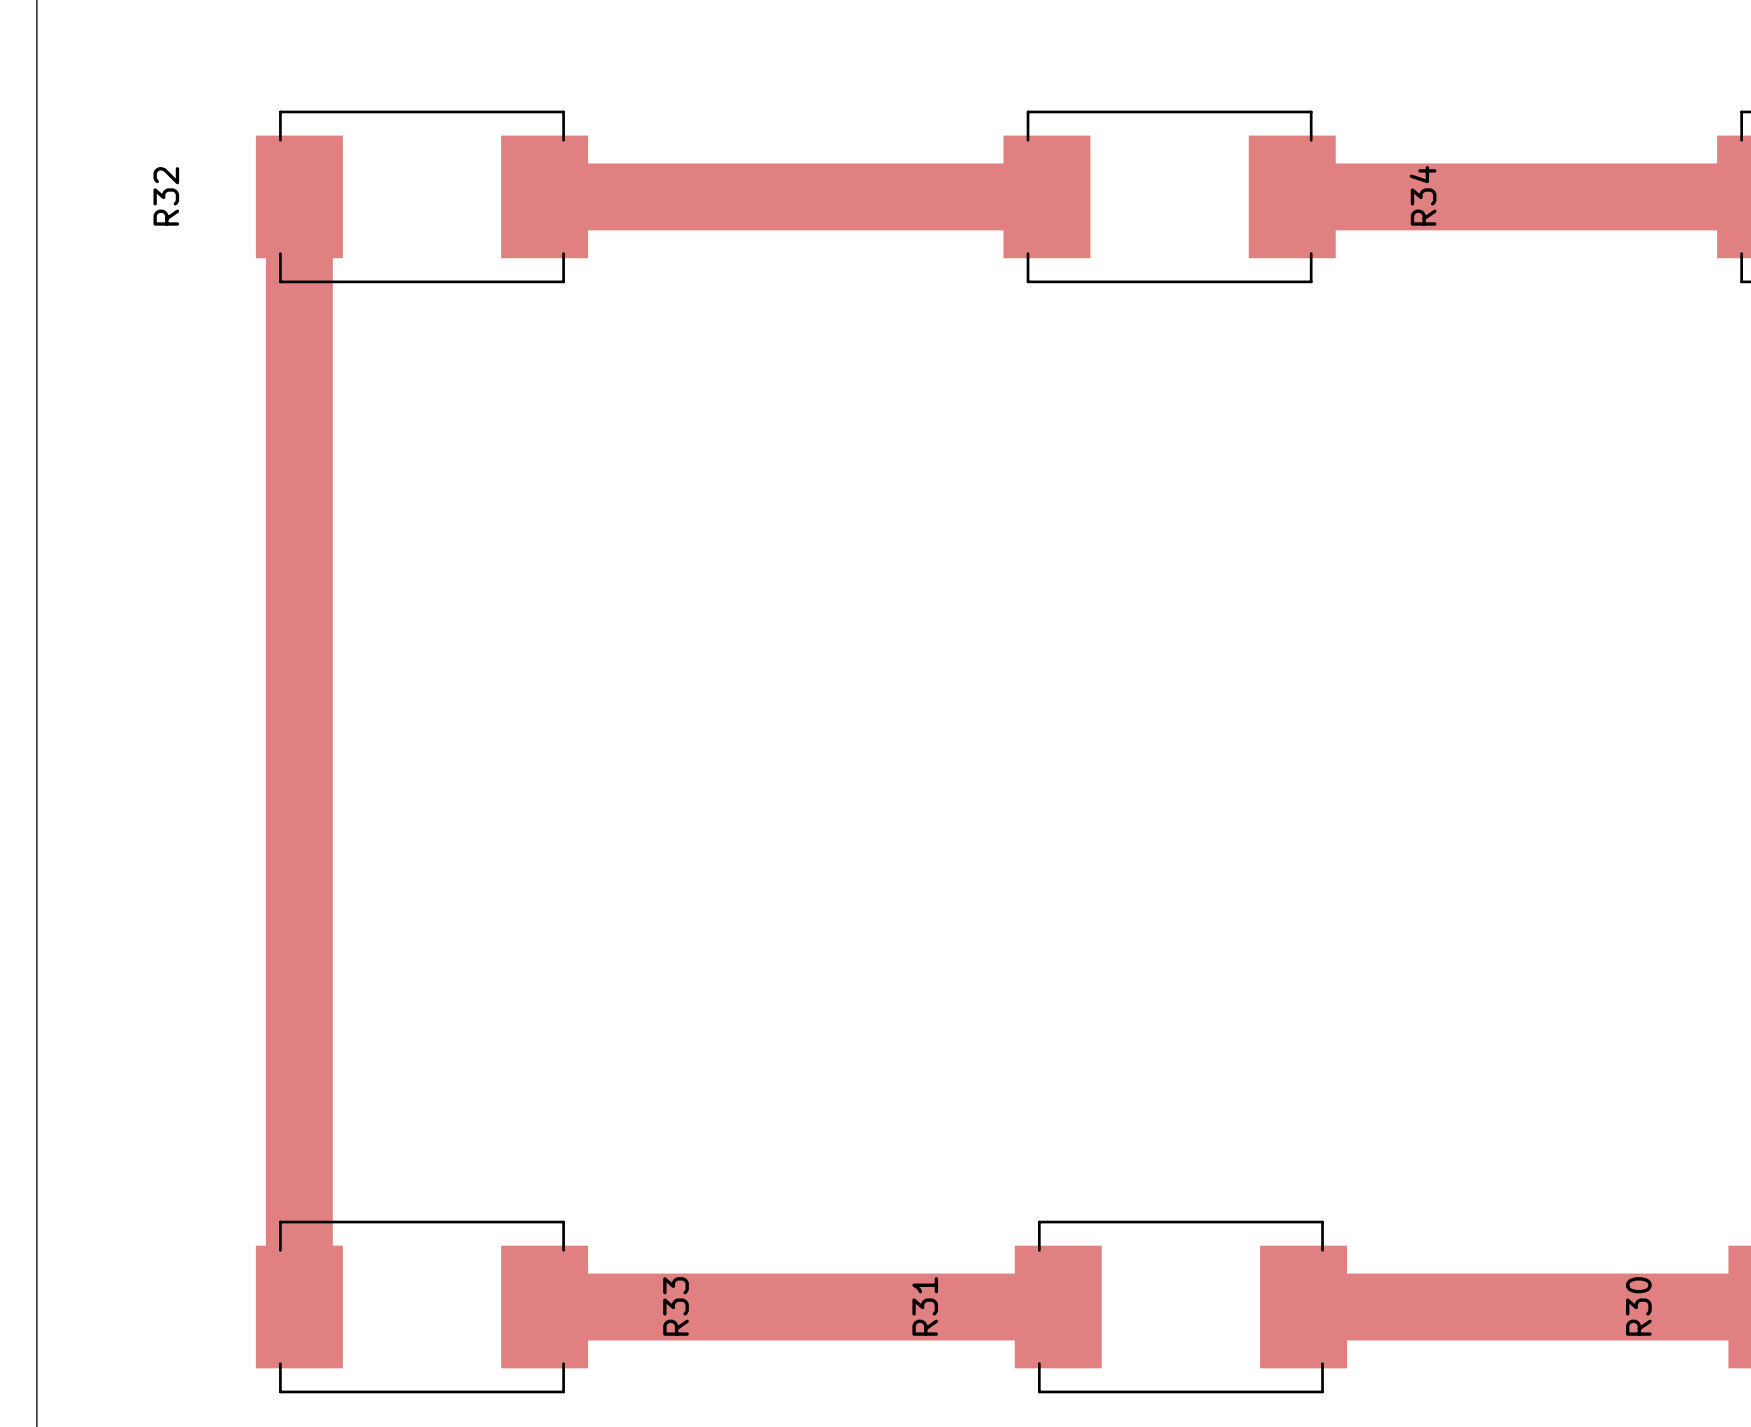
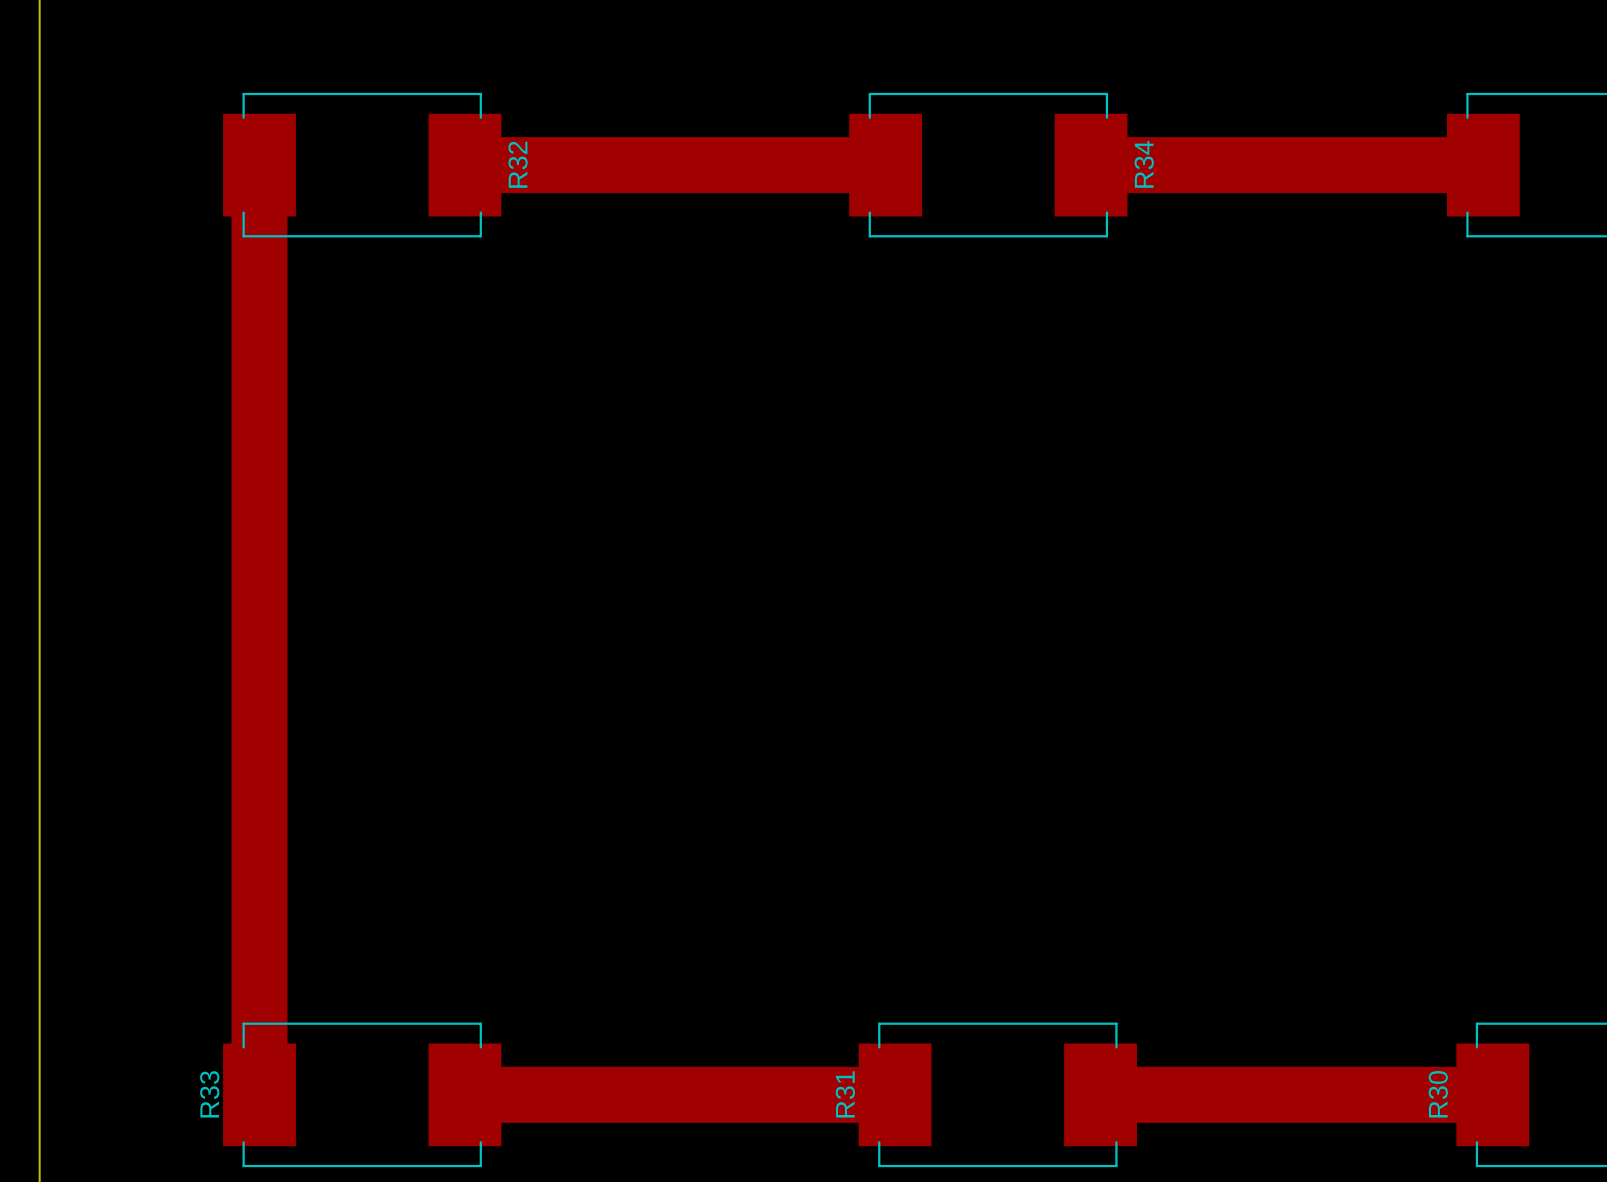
R34 name position: R34 (1423, 195) -> R34 (1144, 164)
R32 name position: R32 (166, 196) -> R32 (518, 164)
R33 name position: R33 (676, 1306) -> R33 (209, 1094)
R31 name position: R31 (925, 1306) -> R31 (845, 1094)
R30 name position: R30 (1638, 1306) -> R30 (1438, 1094)

